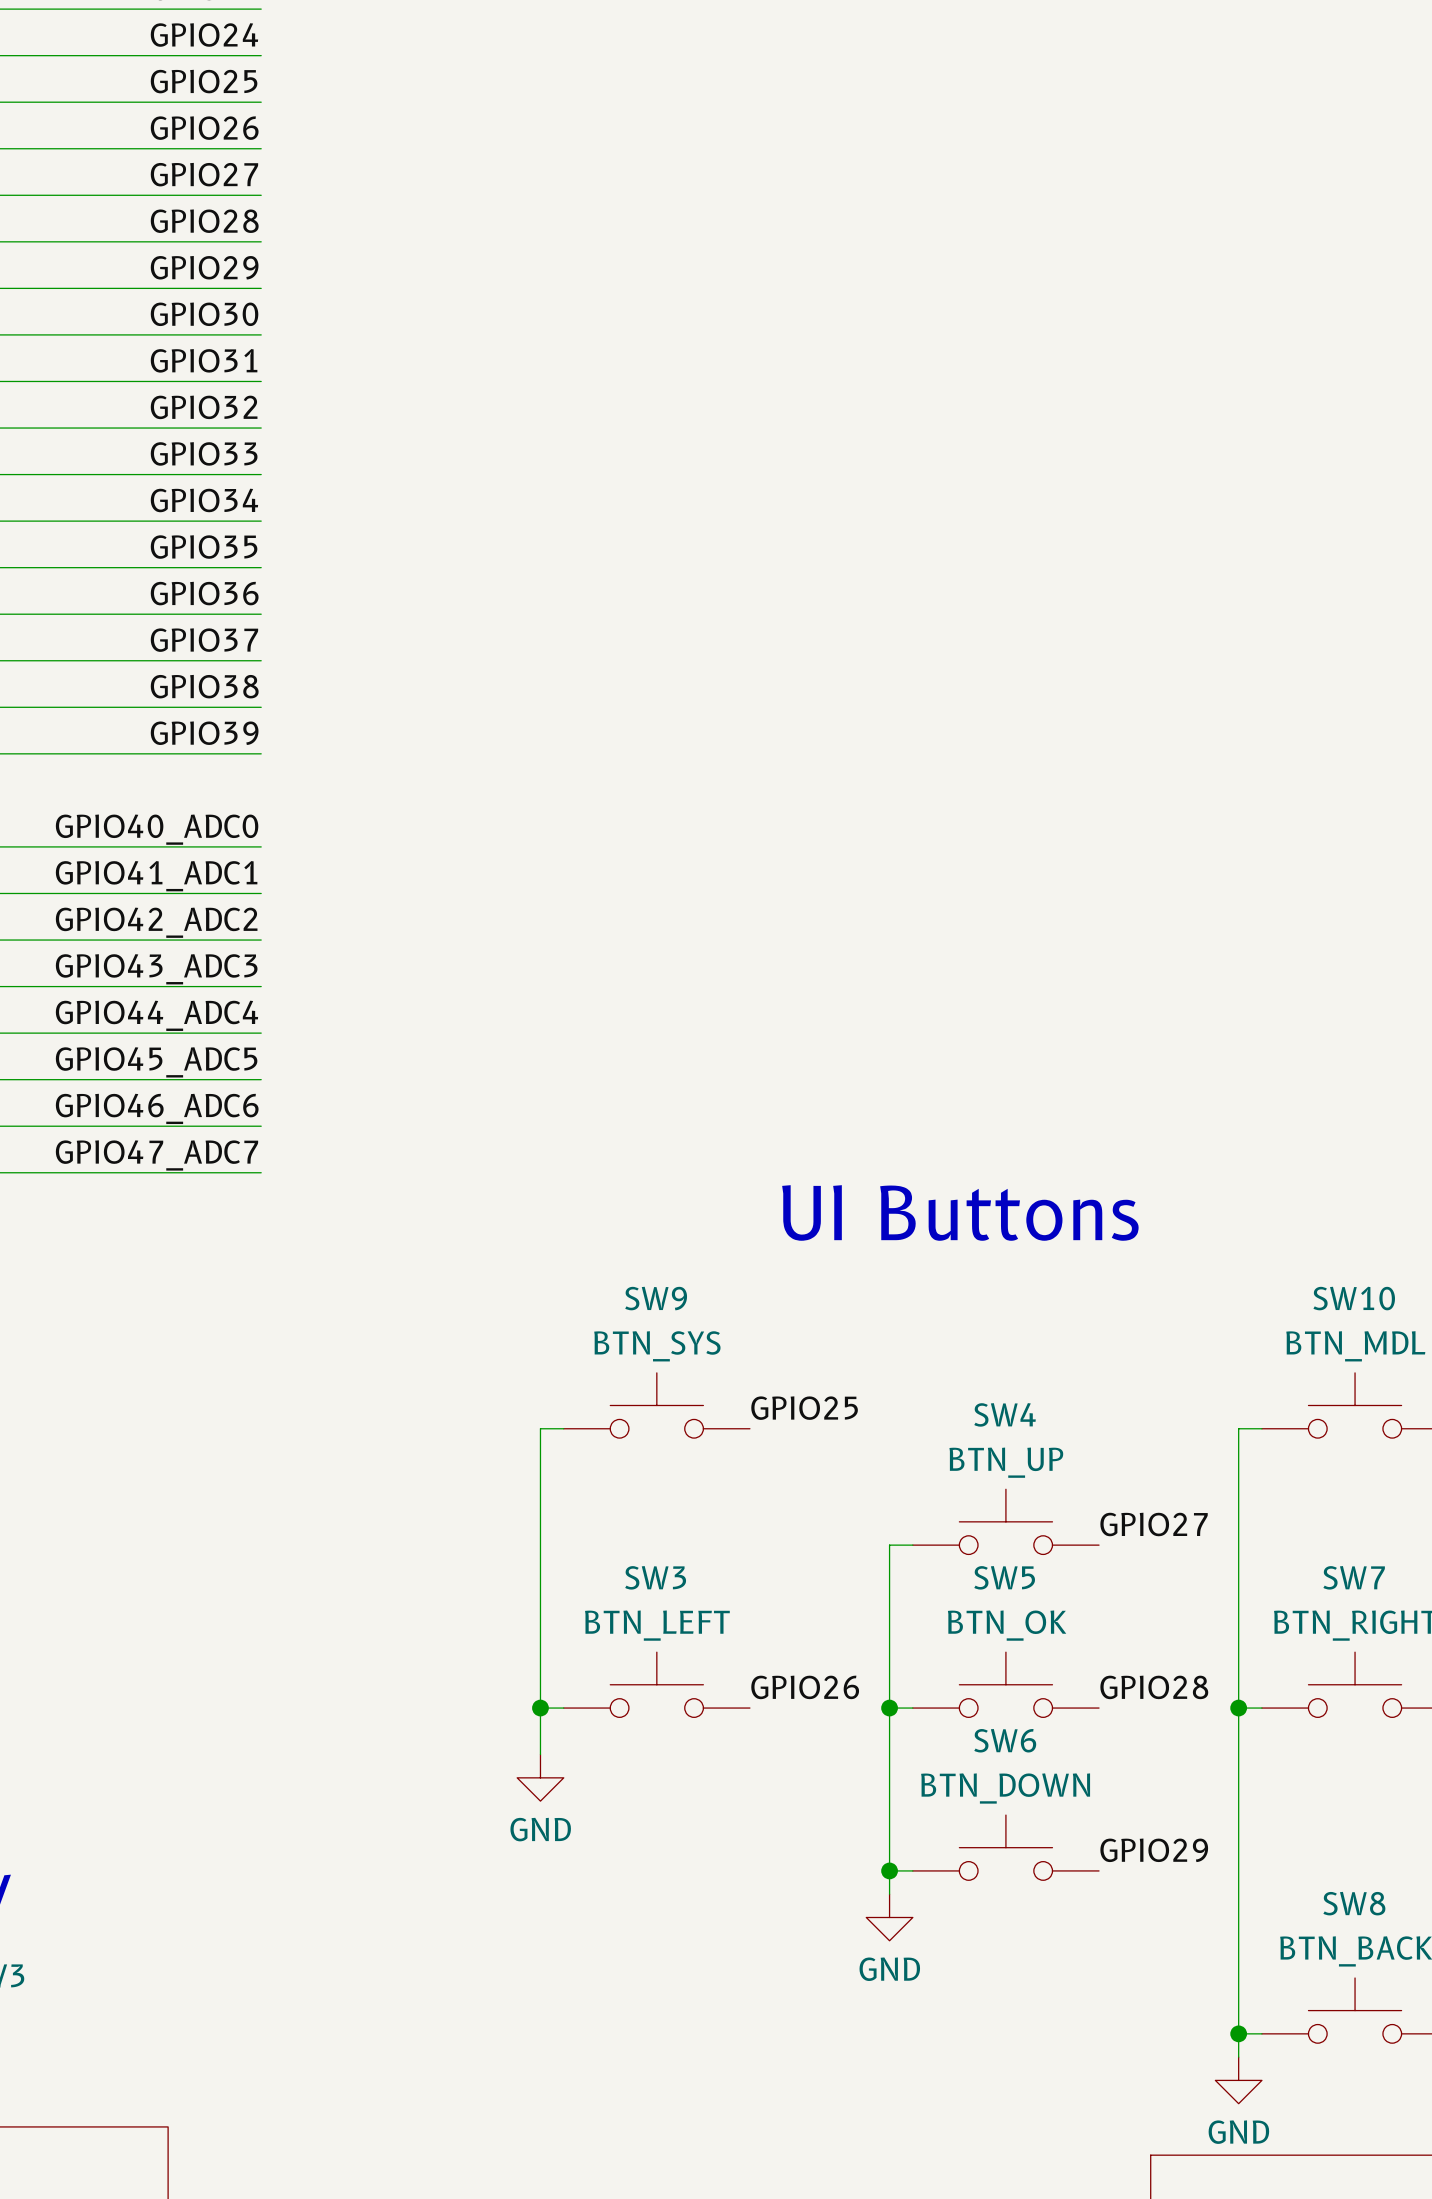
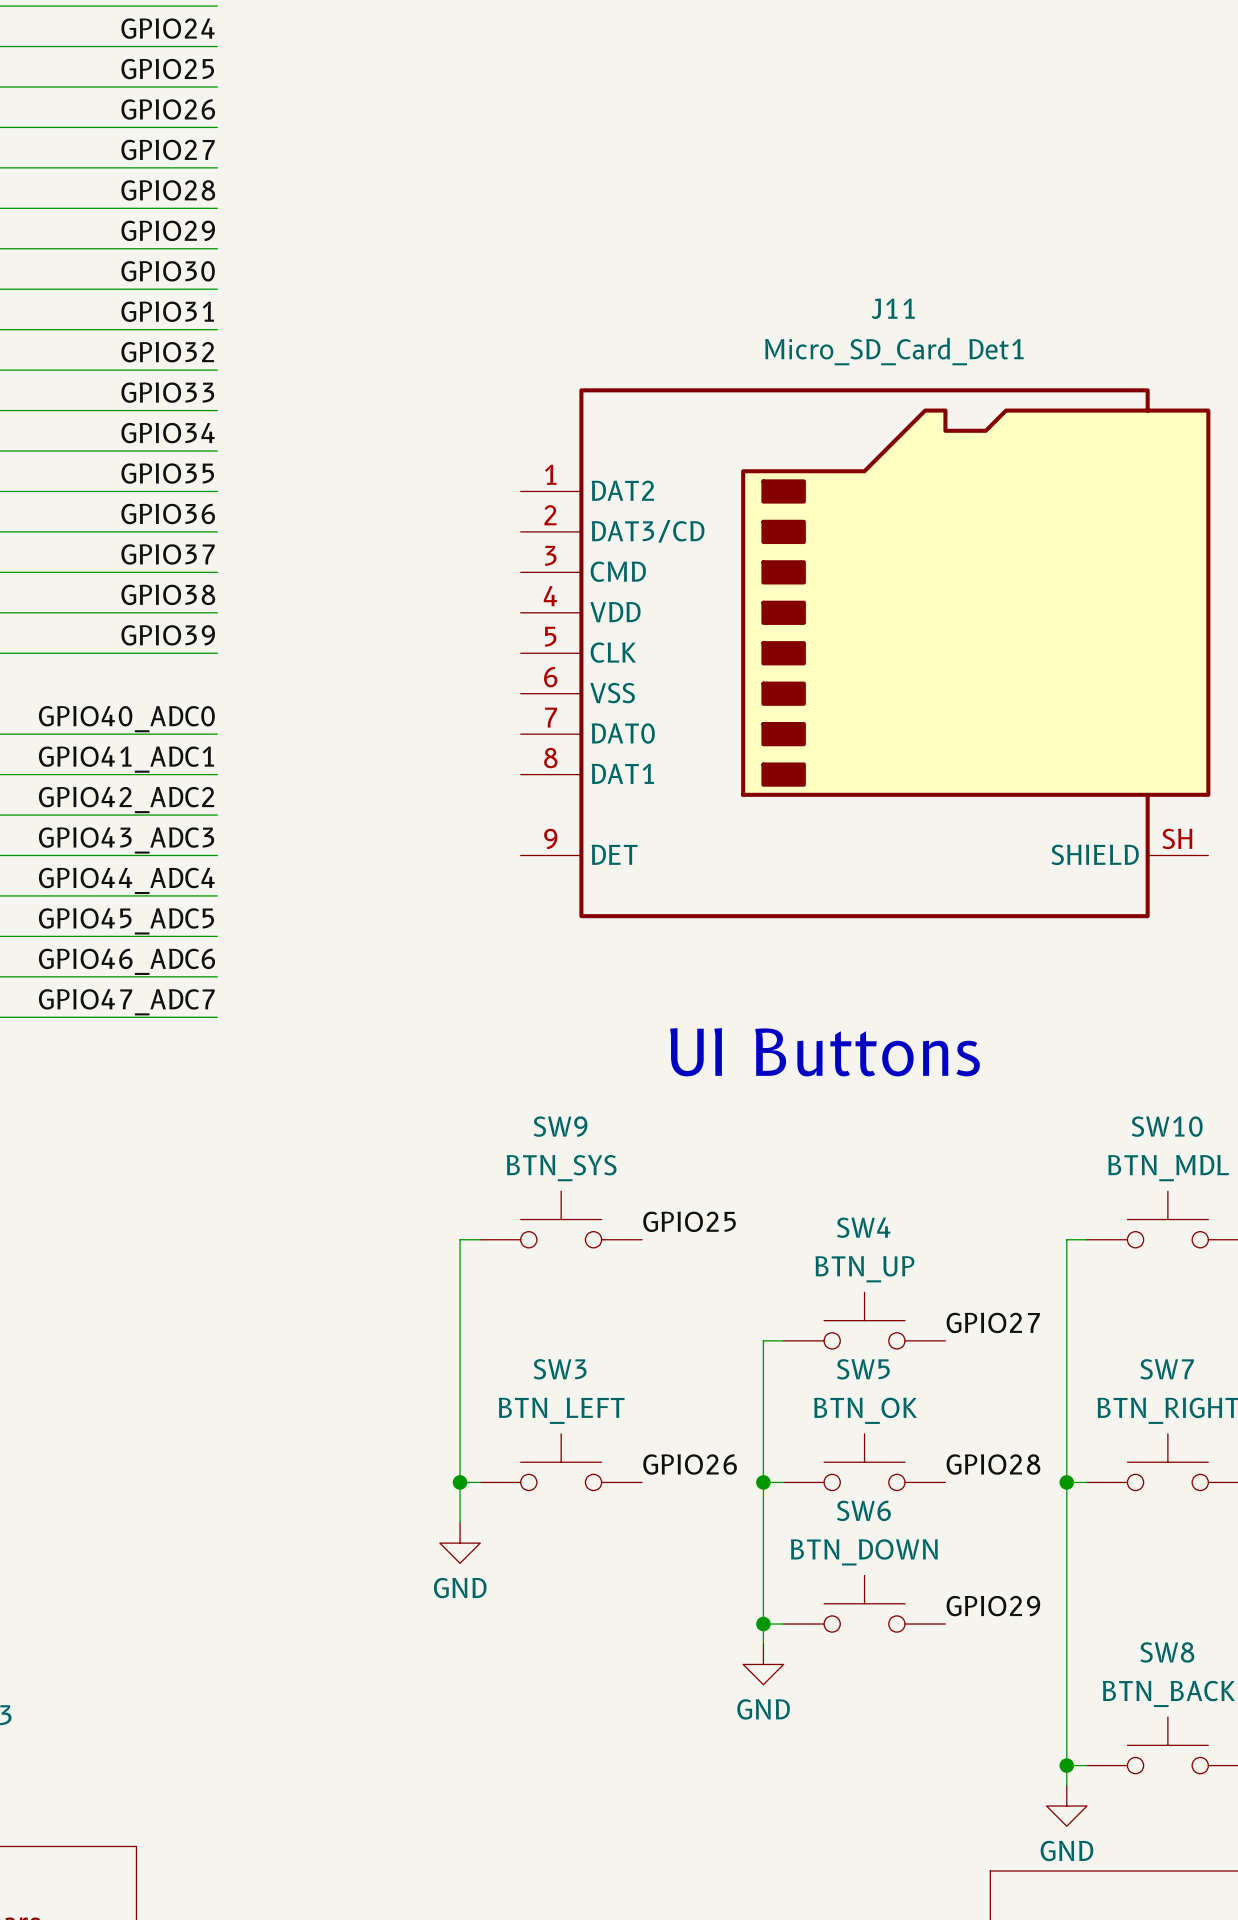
J11: none -> Micro_SD_Card_Det1 (865, 653)

